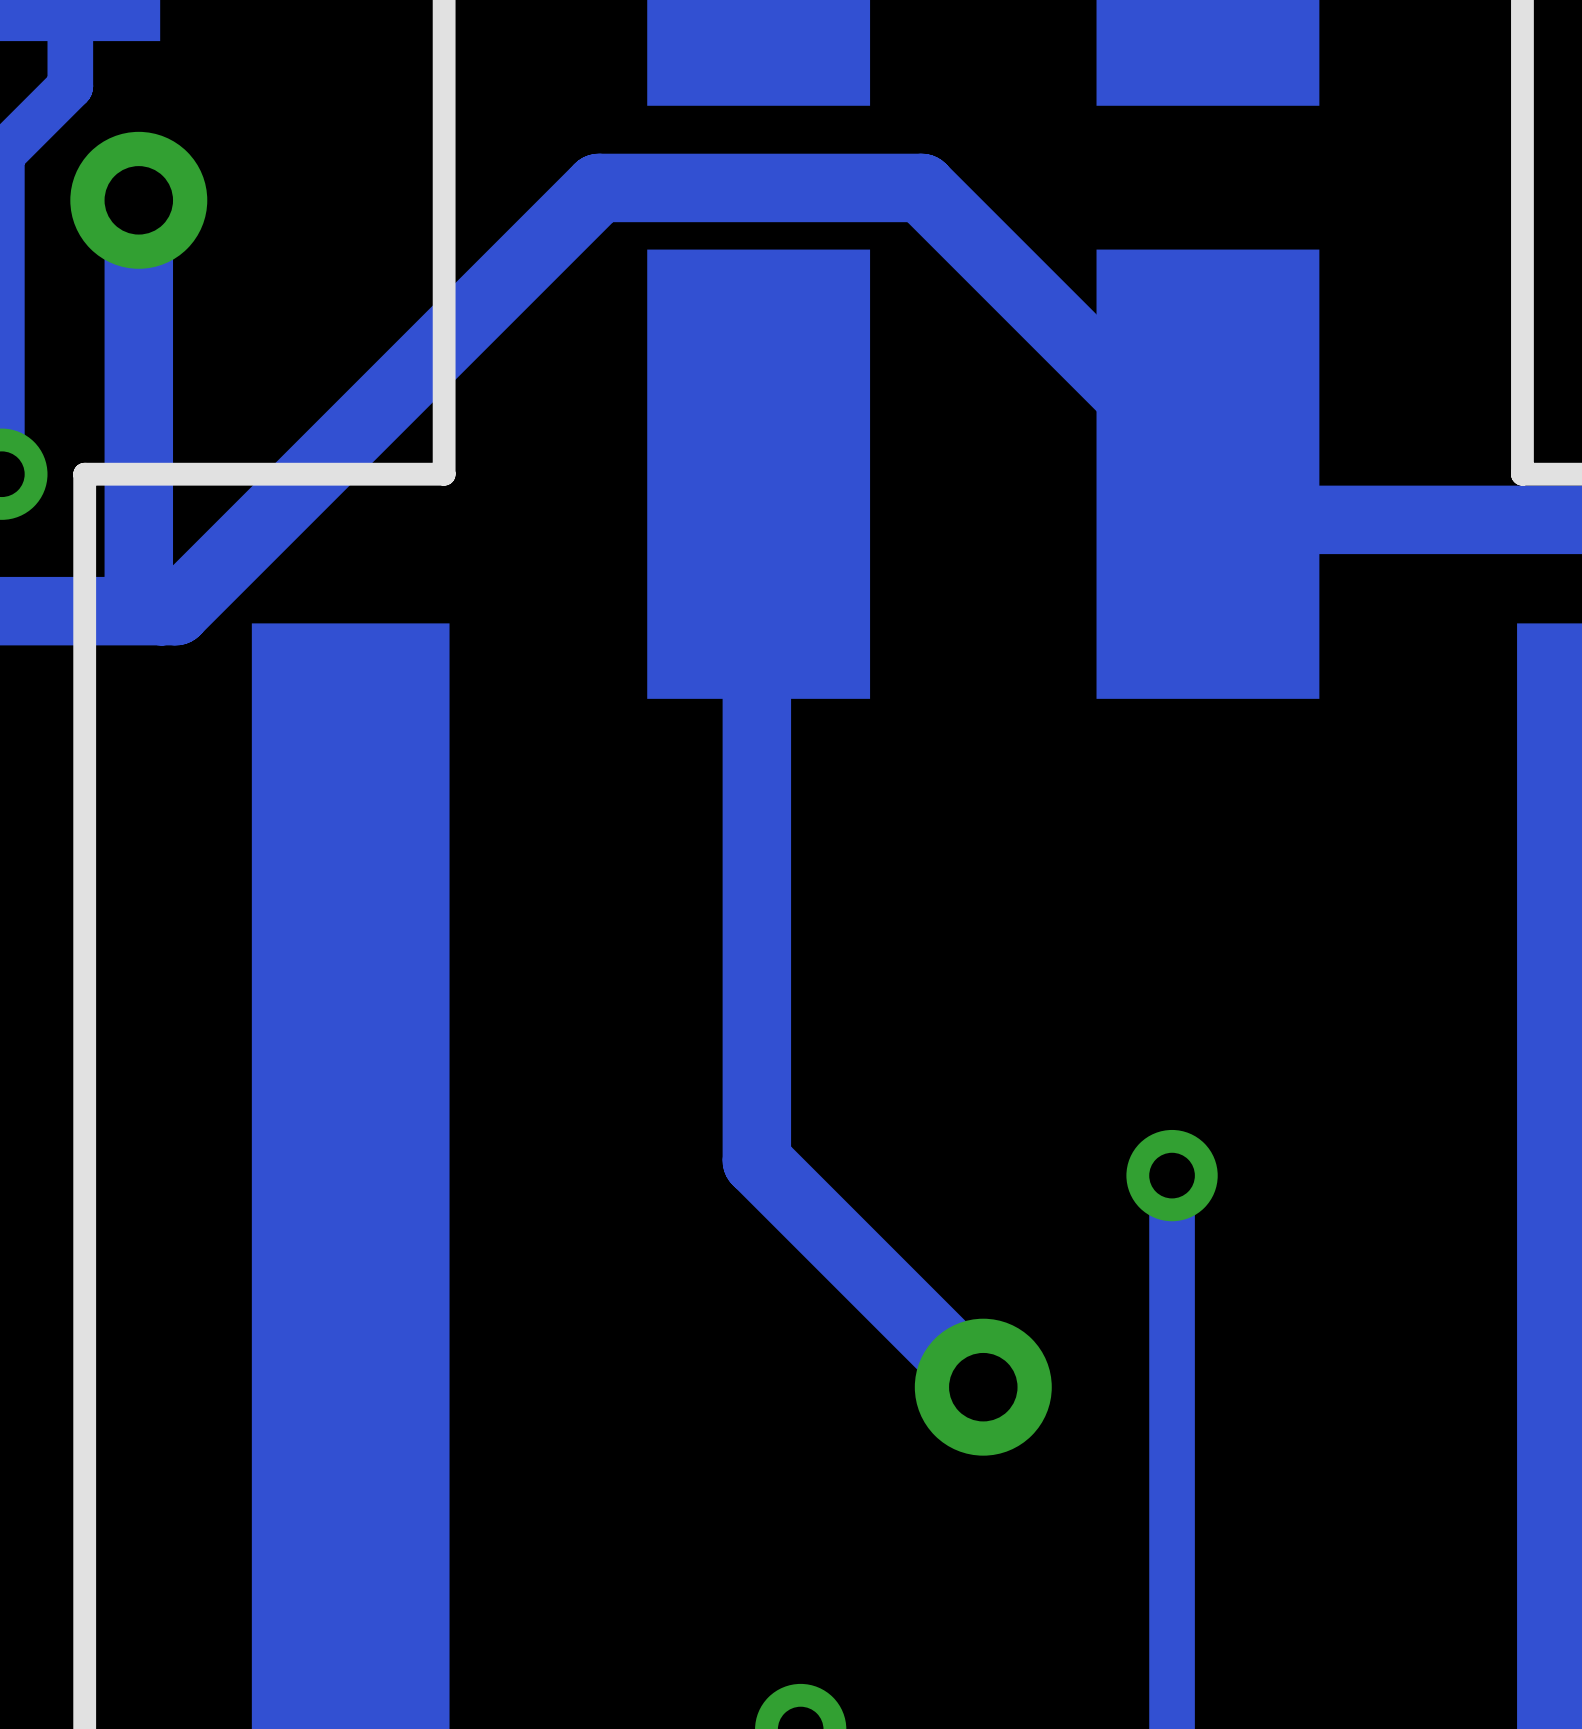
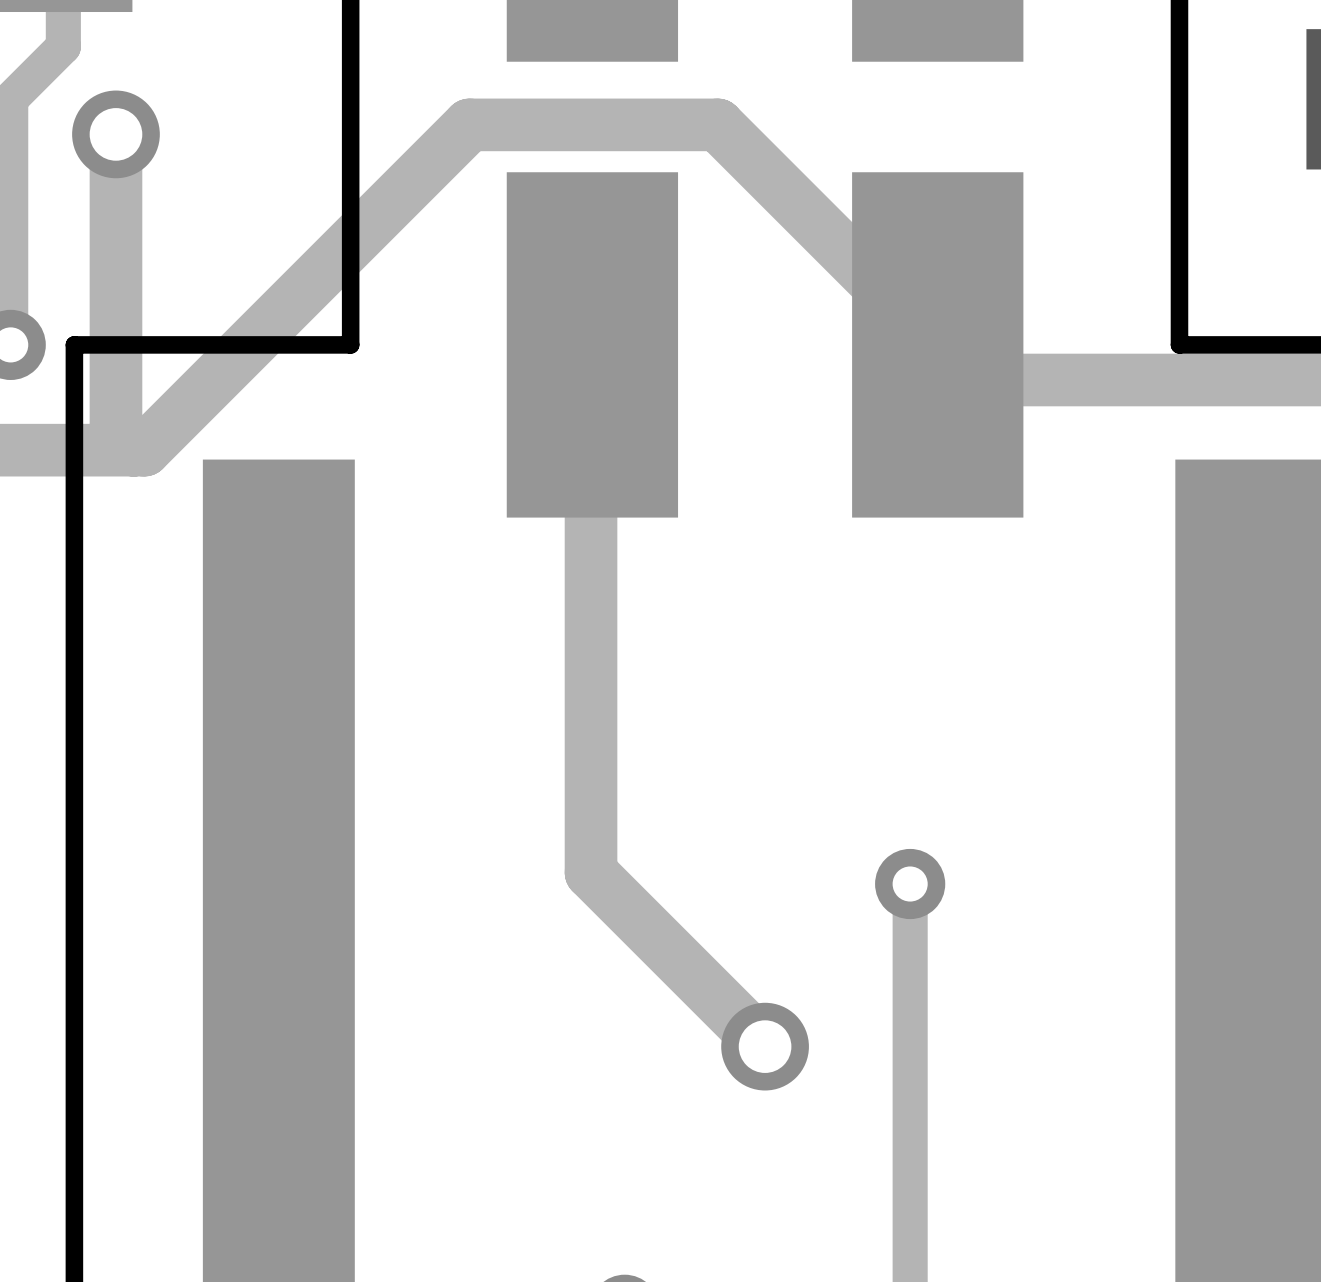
via size: [70, 131, 208, 269] -> [72, 90, 160, 179]
via size: [914, 1318, 1052, 1456] -> [721, 1002, 809, 1091]

